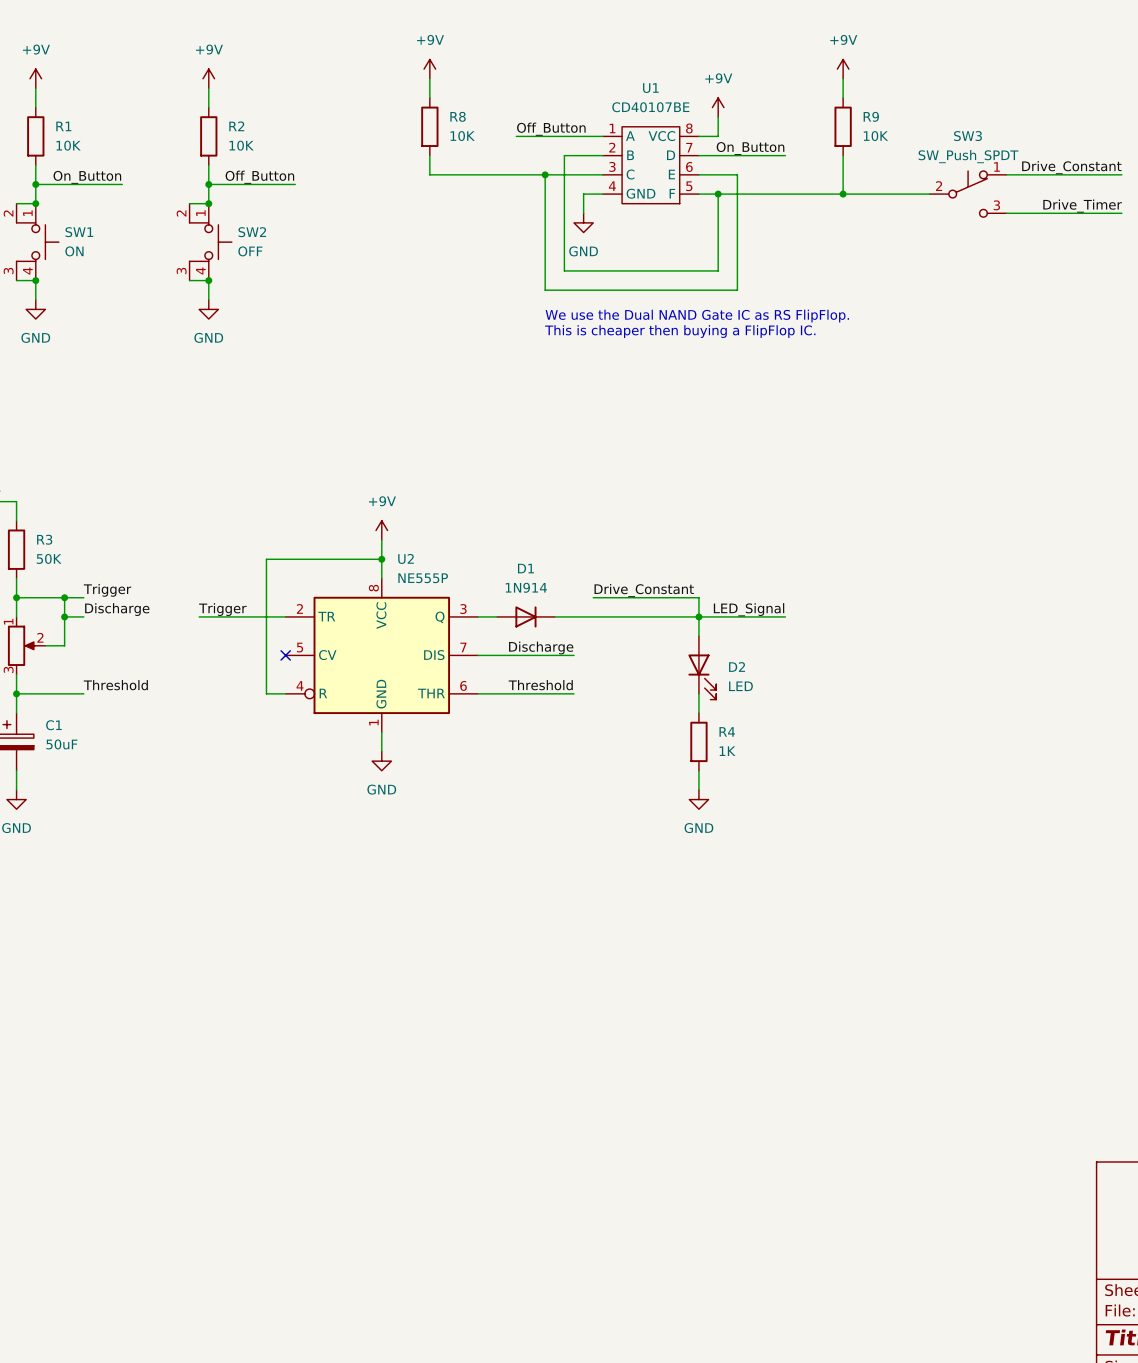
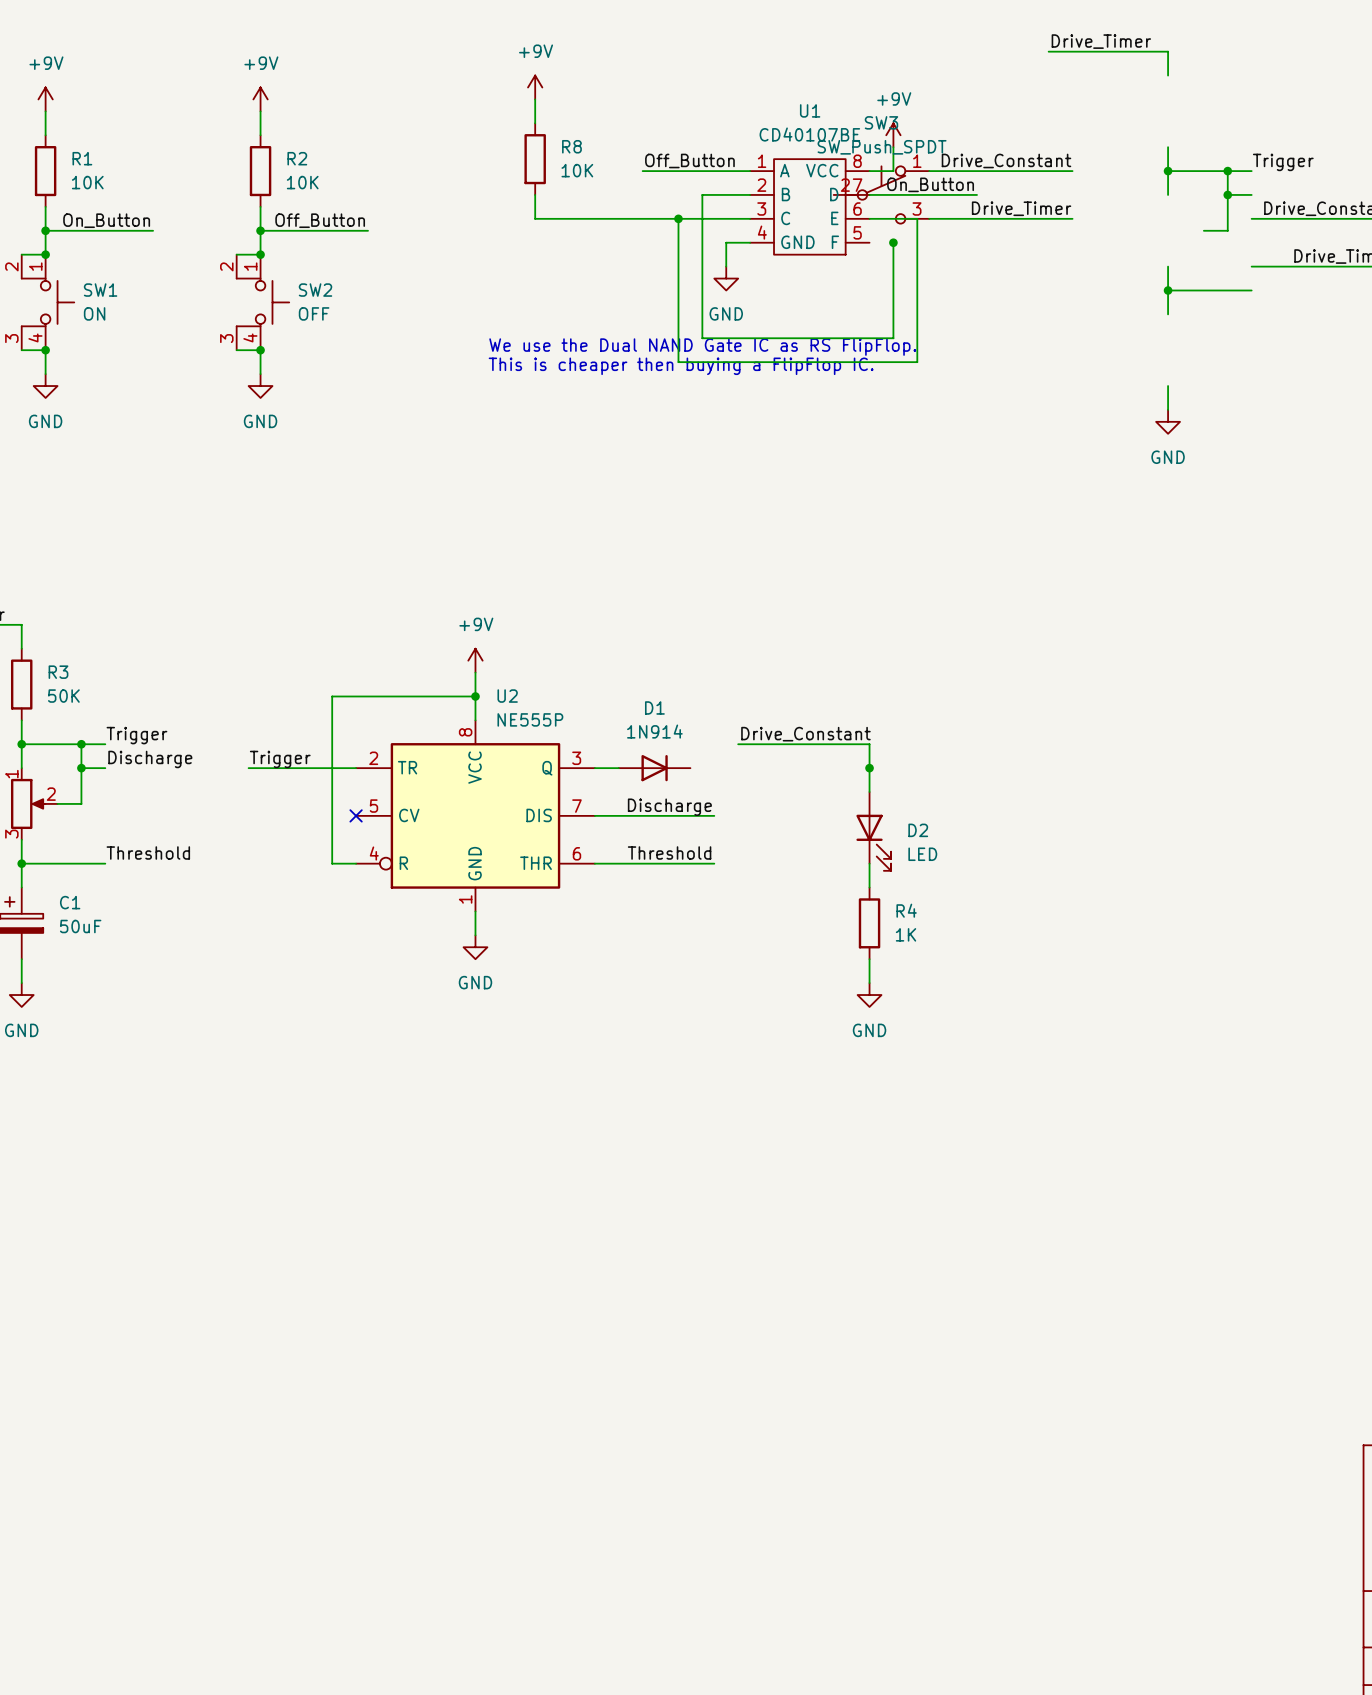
label: none -> Drive_Timer (1101, 41)
wire: none -> (1048, 51) (1168, 51) (1168, 75)
power symbol: +9V (843, 69) -> none
wire: (843, 78) (843, 97) -> none
R9: 10K (843, 126) -> none
label: none -> Drive_Constant (1006, 160)
label: none -> Trigger (1283, 162)
wire: none -> (929, 171) (1072, 171)
wire: none -> (1168, 171) (1251, 171)
junction: none -> (1168, 171)
wire: none -> (1227, 171) (1227, 230) (1203, 230)
junction: none -> (1227, 171)
wire: (843, 155) (843, 194) -> (1168, 147) (1168, 194)
junction: none -> (1227, 194)
label: none -> Drive_Timer (1021, 208)
wire: none -> (929, 218) (1072, 218)
wire: (698, 194) (929, 194) -> none
junction: (843, 194) -> none
SW3 position: (968, 194) -> (881, 194)
wire: none -> (1168, 266) (1168, 314)
wire: none -> (1168, 290) (1251, 290)
junction: none -> (1168, 290)
wire: none -> (1168, 386) (1168, 409)
text position: We use the Dual NAND Gate IC as RS FlipFlop. (697, 316) -> We use the Dual NAND Gate IC as RS FlipFlop. (702, 347)
text position: This is cheaper then buying a FlipFlop IC. (680, 331) -> This is cheaper then buying a FlipFlop IC. (681, 366)
power symbol: none -> GND (1168, 421)
label: LED_Signal (749, 609) -> none
wire: (554, 616) (785, 616) -> none

